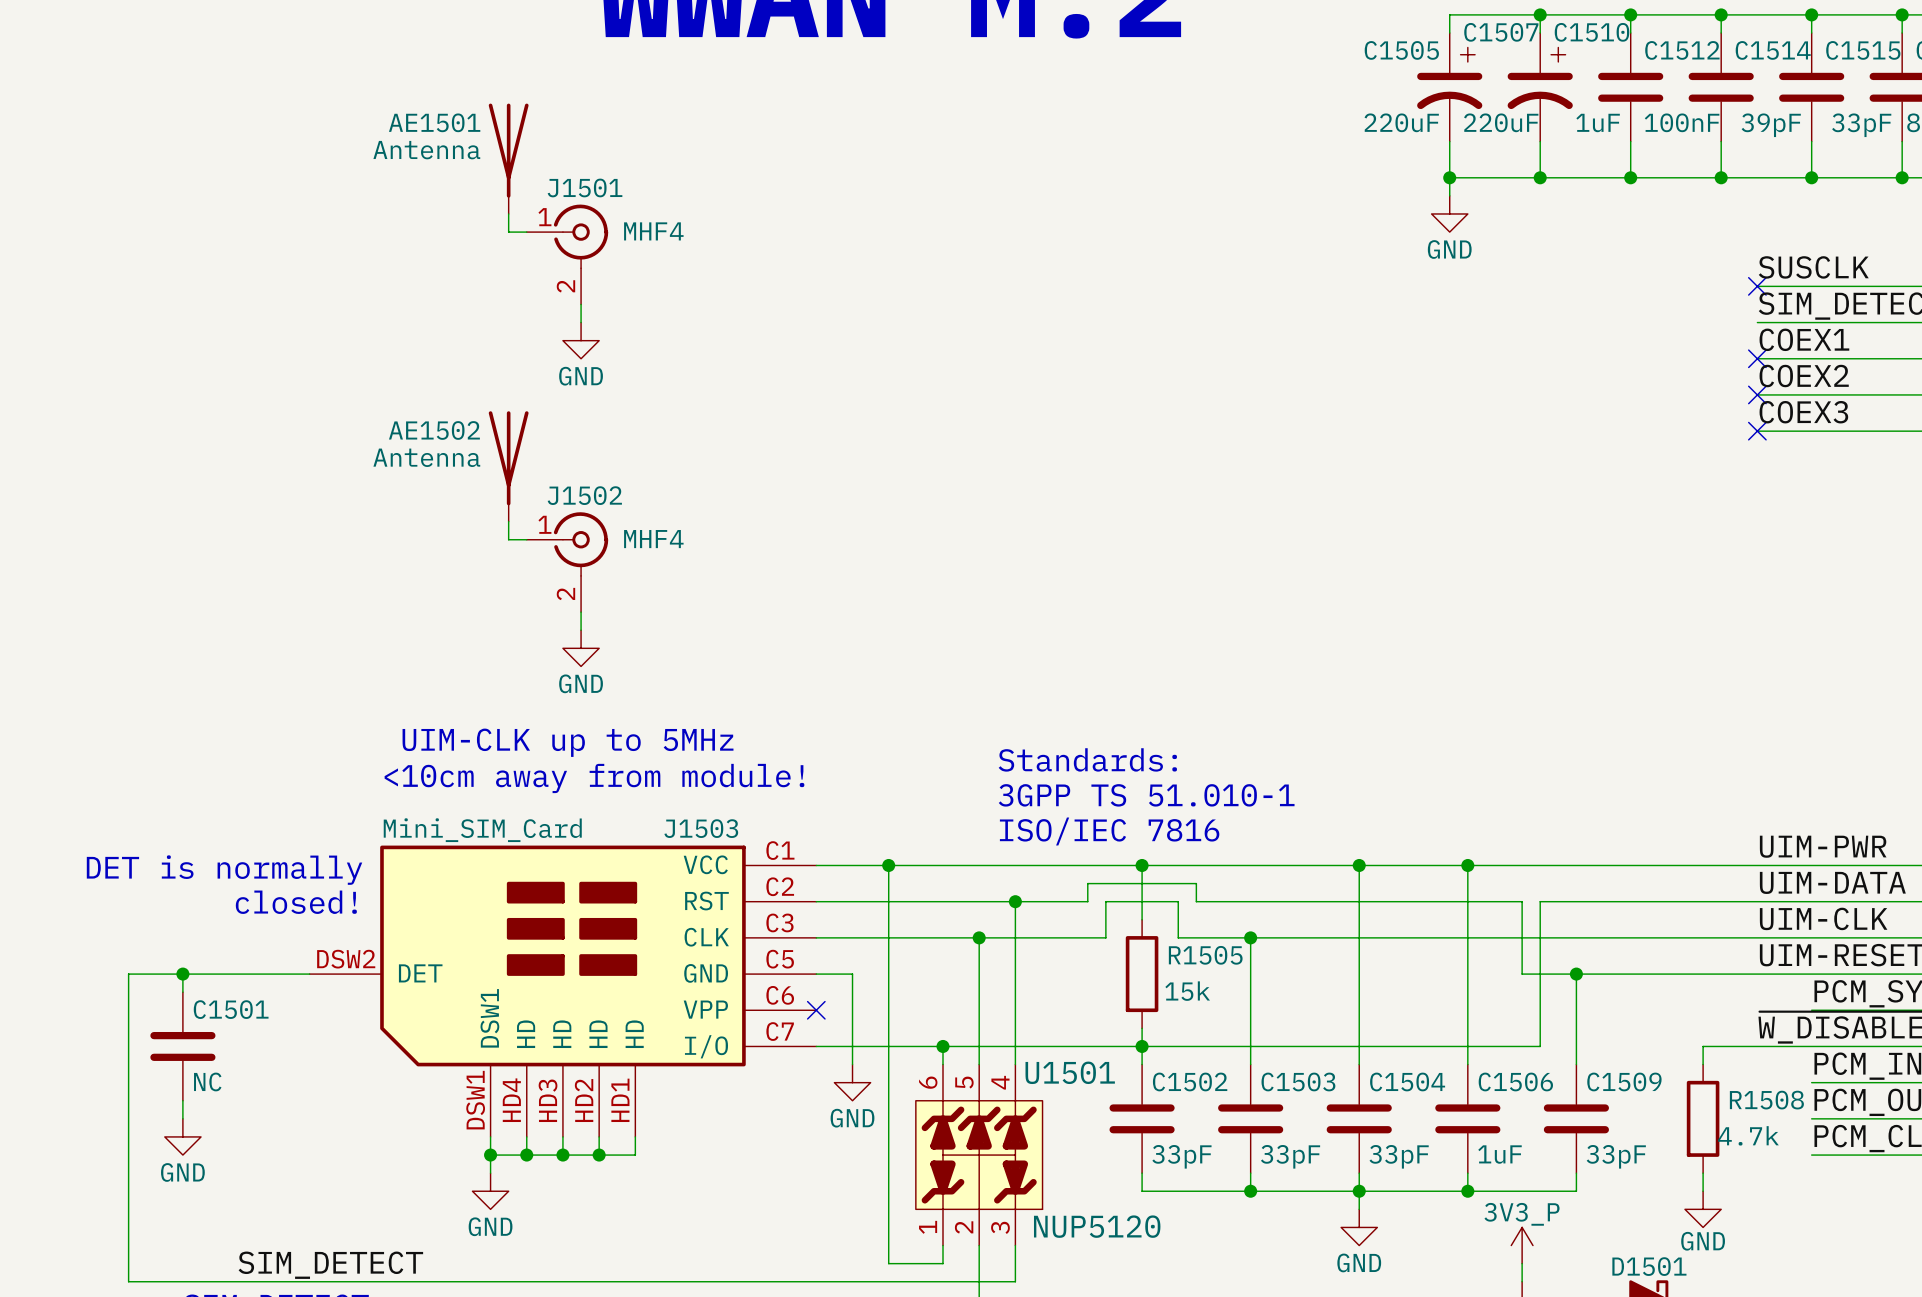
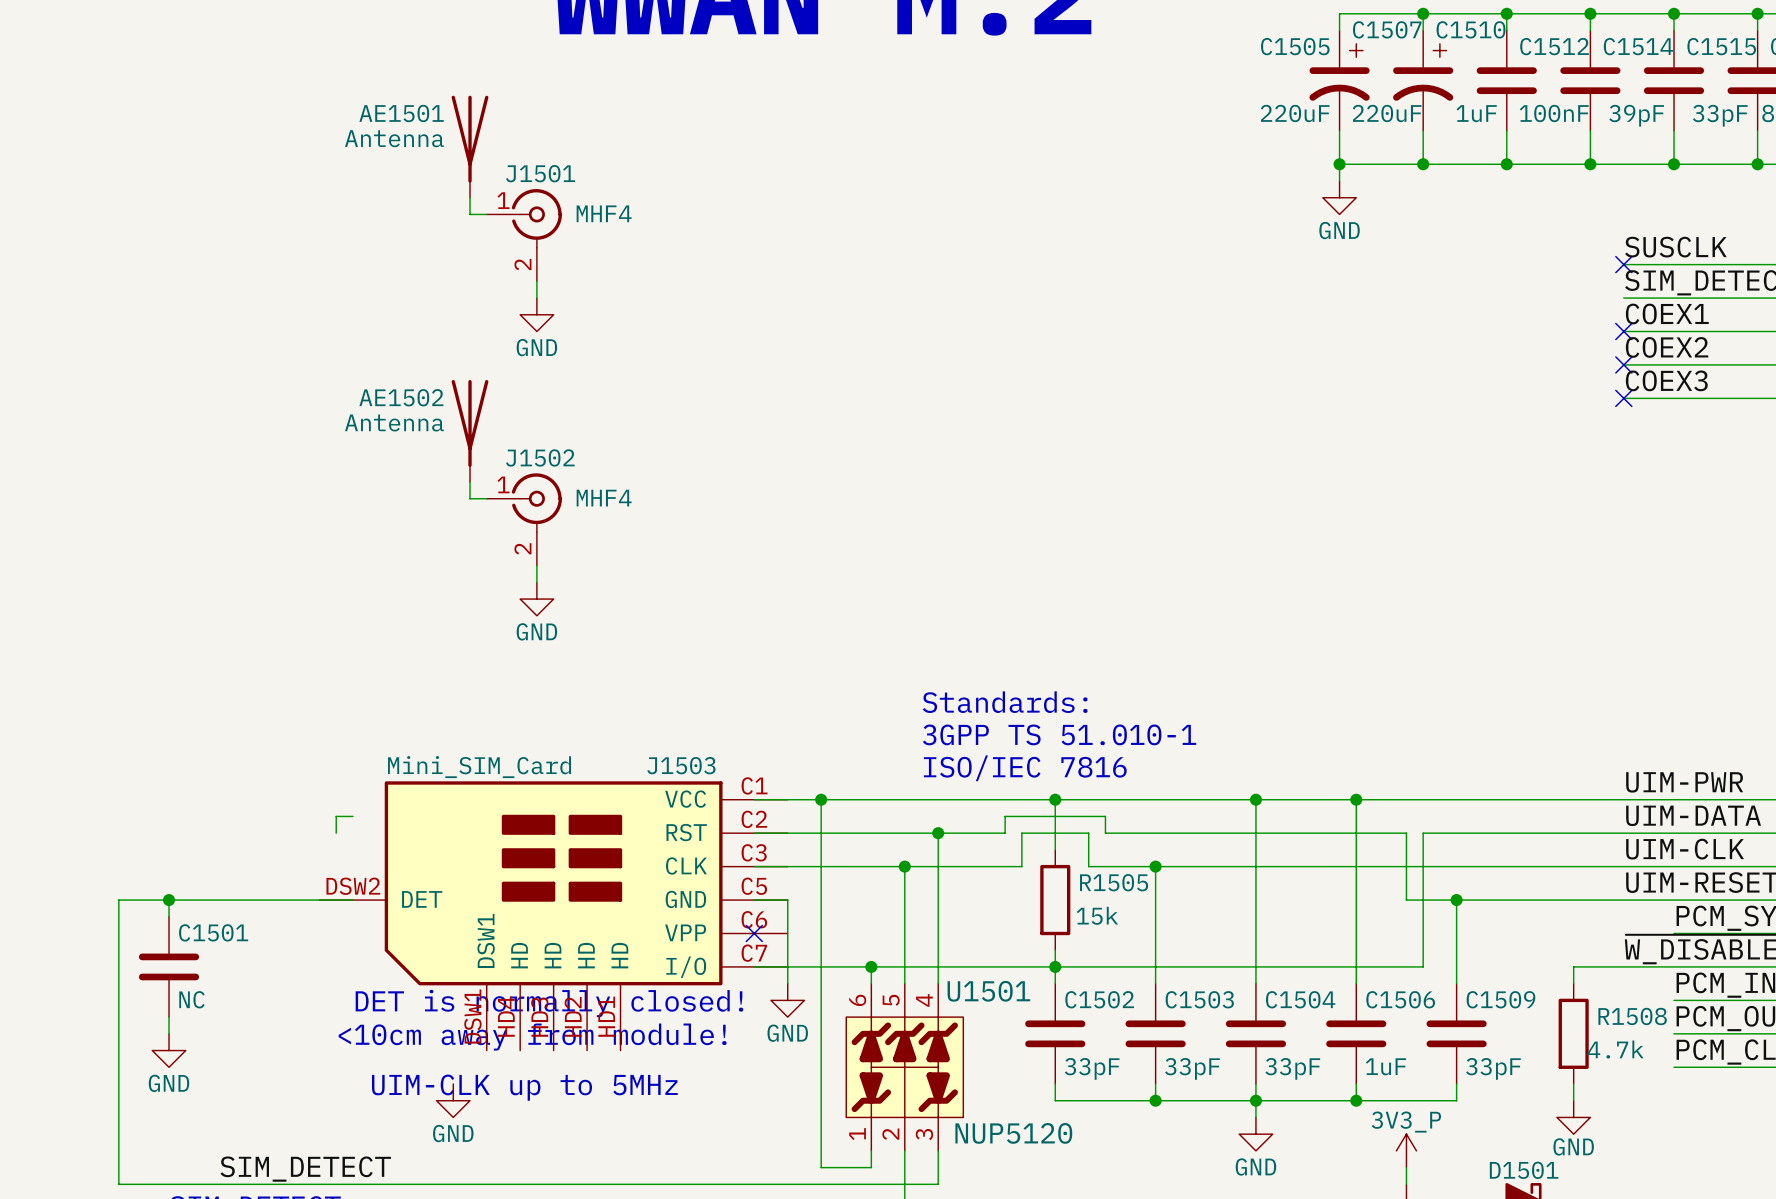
text: UIM-CLK up to 5MHz (568, 742) -> none
text position: <10cm away from module! (594, 778) -> <10cm away from module! (532, 1037)
text: DET is normally (224, 870) -> none
wire: none -> (352, 816) (336, 816) (336, 833)
text: closed! (296, 902) -> none
J1503 position: (562, 991) -> (553, 915)
text: none -> DET is normally closed! (549, 1003)
wire: (490, 1136) (490, 1173) -> none
wire: (526, 1136) (526, 1155) -> none
wire: (562, 1136) (562, 1155) -> none
wire: (599, 1136) (599, 1155) -> none
wire: (635, 1136) (635, 1155) (490, 1155) -> none
junction: (490, 1155) -> none
junction: (526, 1155) -> none
junction: (562, 1155) -> none
junction: (599, 1155) -> none
text: none -> UIM-CLK up to 5MHz (524, 1087)

